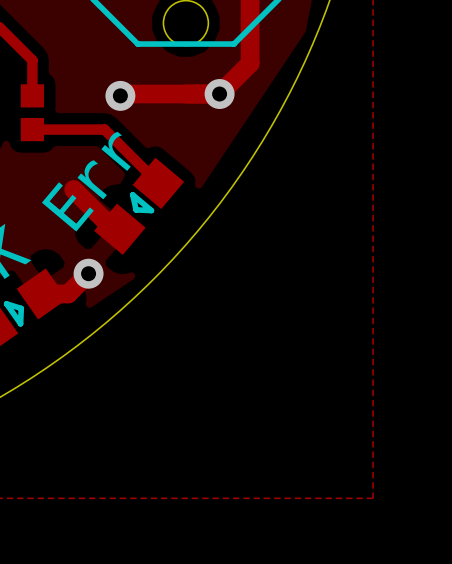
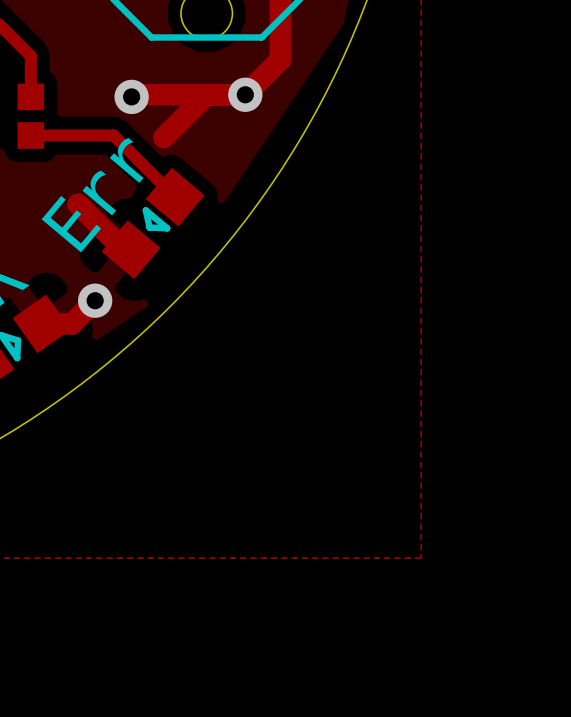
track: none -> (206, 94) (163, 137)

